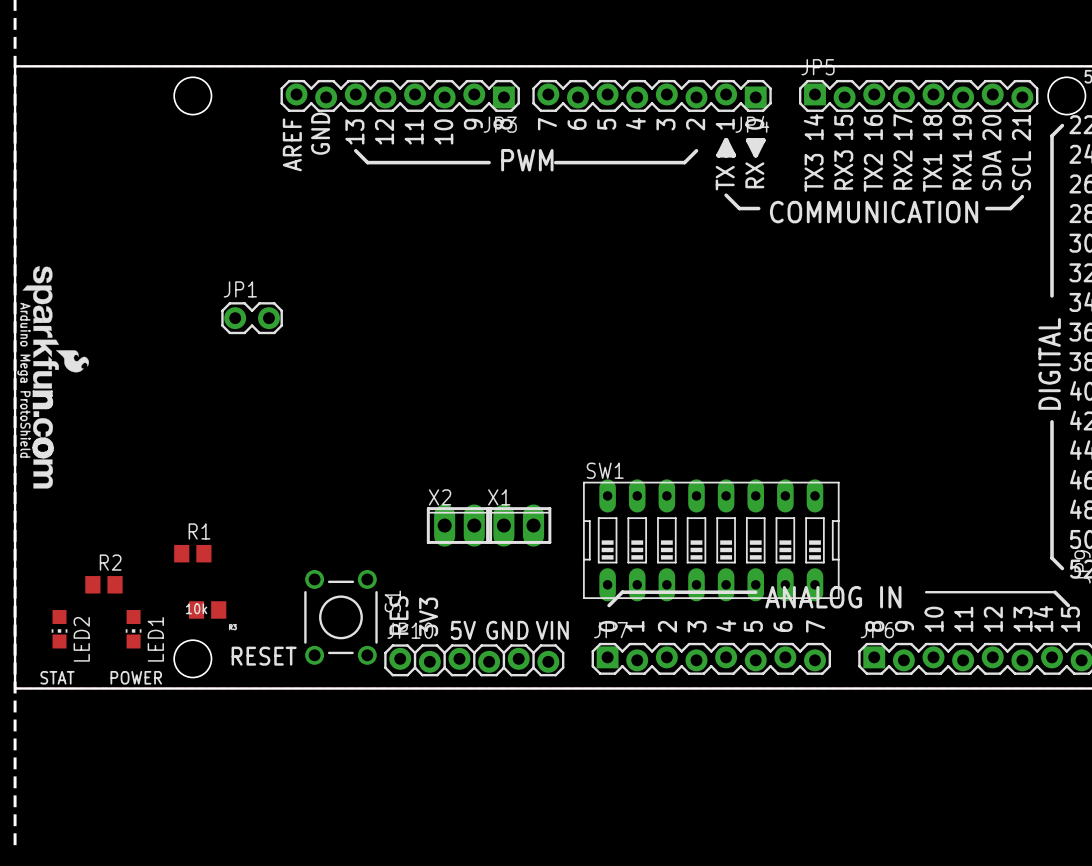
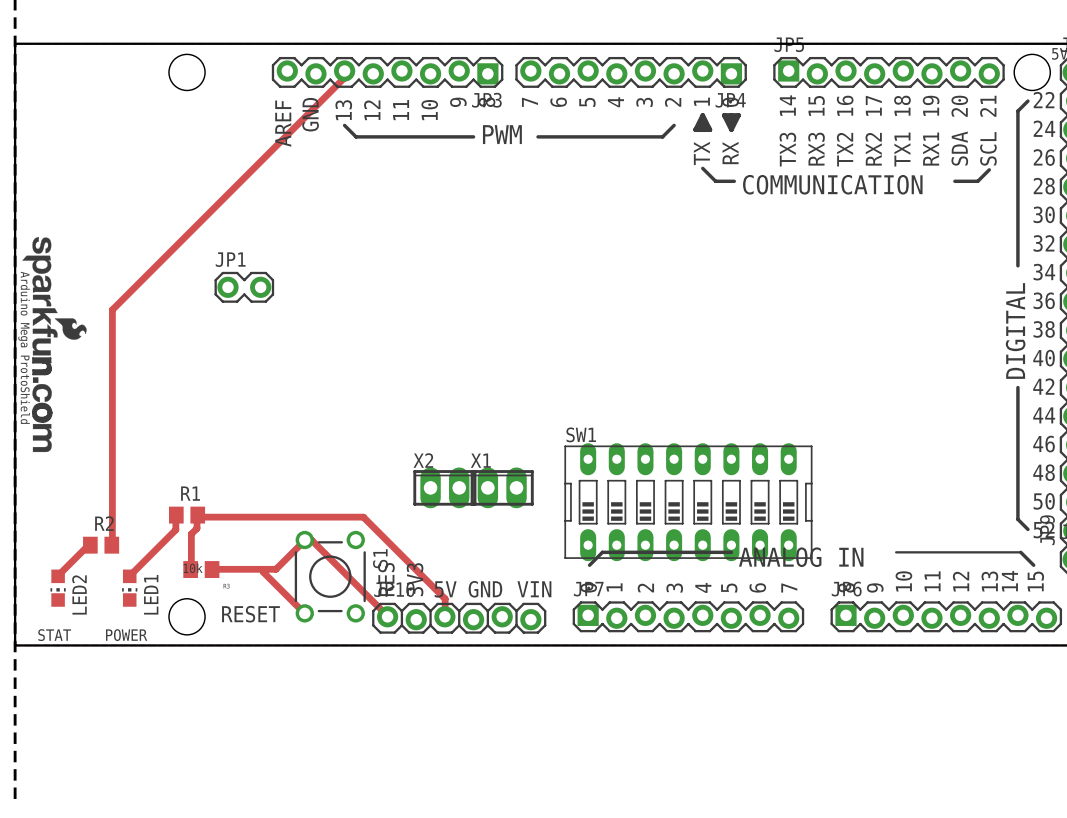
track: none -> (344, 70) (343, 78) (112, 309) (111, 545)
track: none -> (176, 515) (175, 529) (129, 576)
track: none -> (90, 545) (58, 576)
track: none -> (190, 569) (191, 534) (197, 528) (197, 515) (199, 517) (363, 517) (445, 598) (444, 616)
track: none -> (212, 569) (275, 569) (304, 540) (311, 539) (387, 616)
track: none -> (263, 569) (263, 572) (304, 613)

